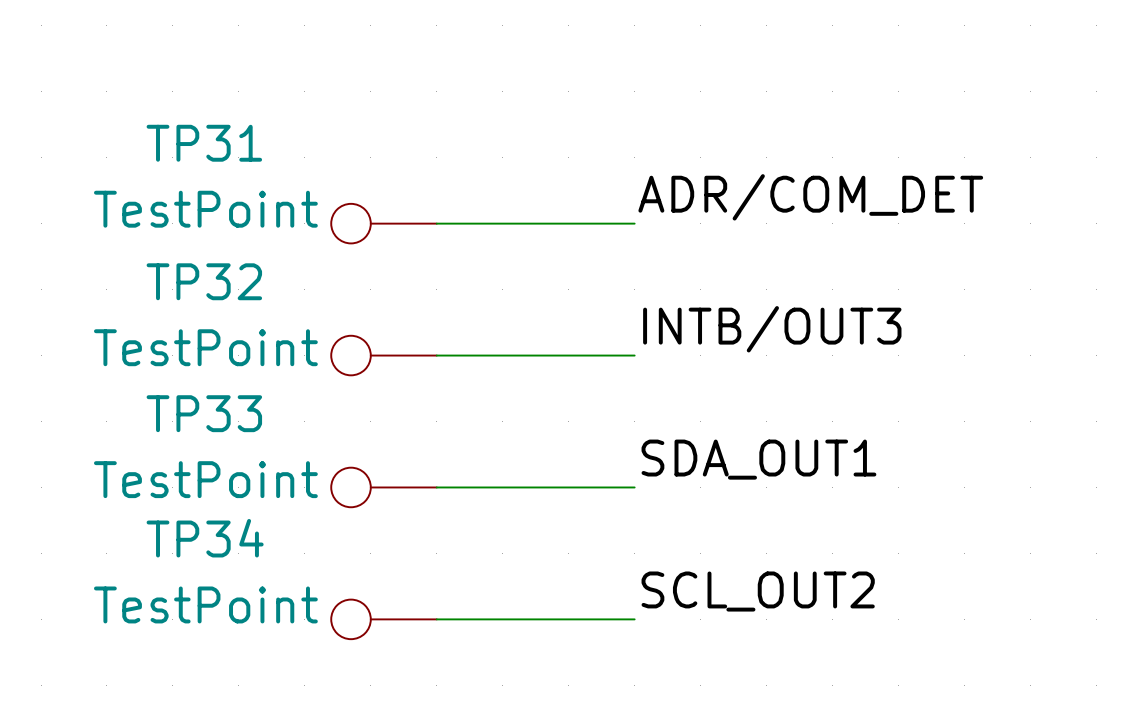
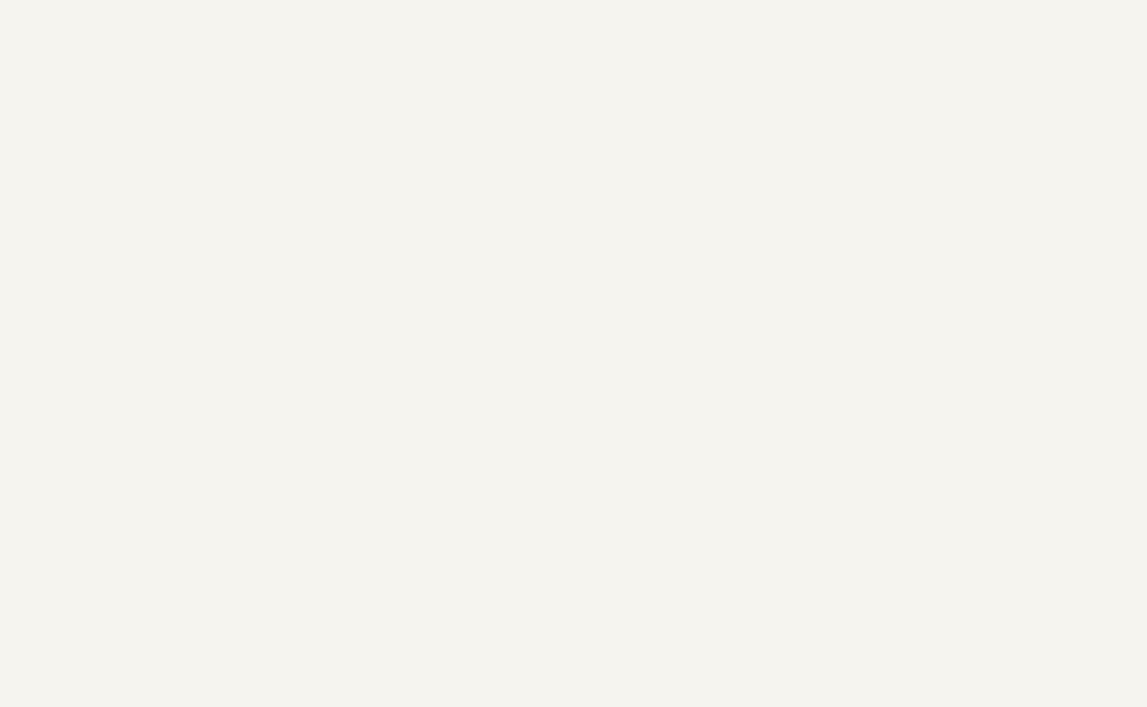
label: ADR/COM_DET (810, 197) -> none
TP31: TestPoint (383, 223) -> none
wire: (436, 223) (634, 223) -> none
label: INTB/OUT3 (772, 329) -> none
TP32: TestPoint (383, 355) -> none
wire: (436, 355) (634, 355) -> none
label: SDA_OUT1 (758, 459) -> none
TP33: TestPoint (383, 487) -> none
wire: (436, 487) (634, 487) -> none
label: SCL_OUT2 (758, 591) -> none
TP34: TestPoint (383, 619) -> none
wire: (436, 619) (634, 619) -> none

